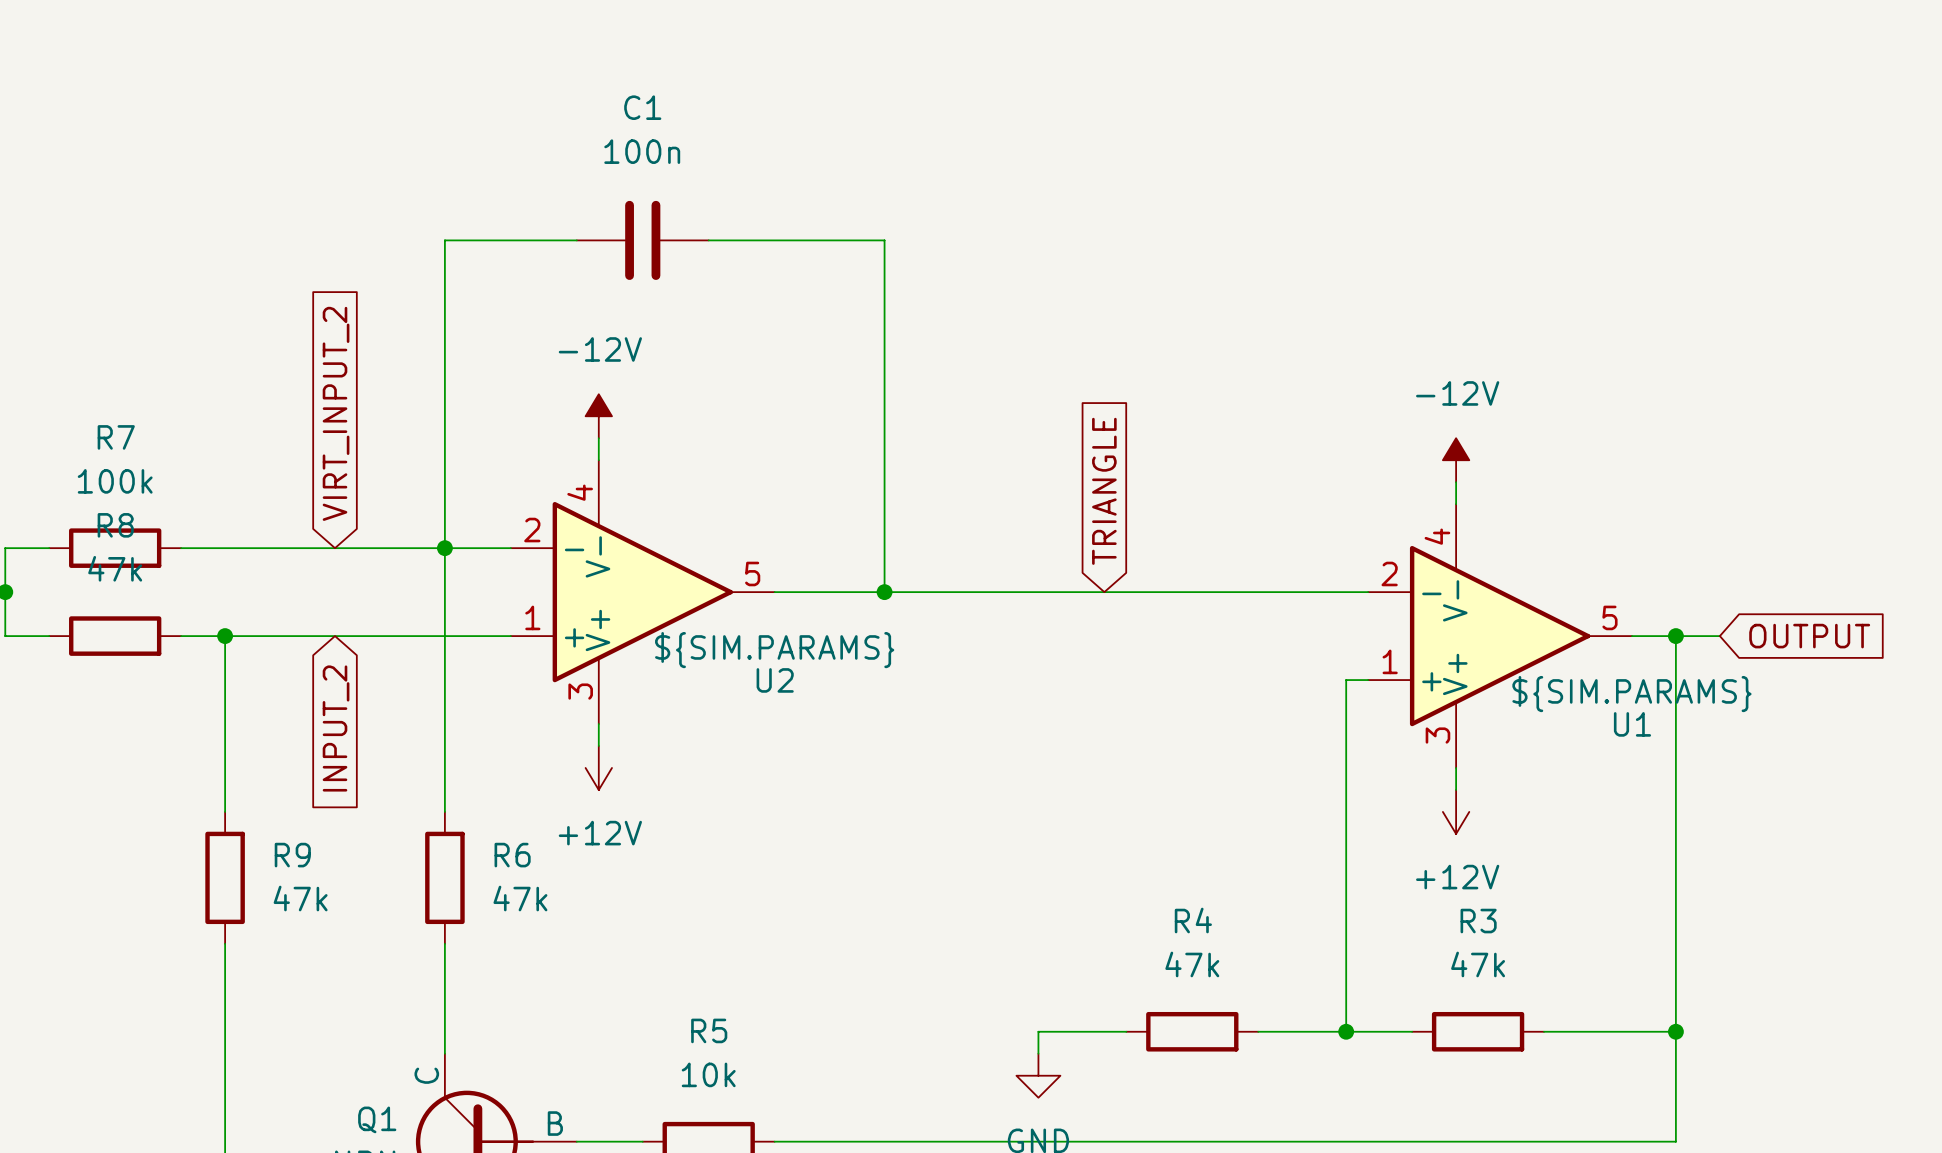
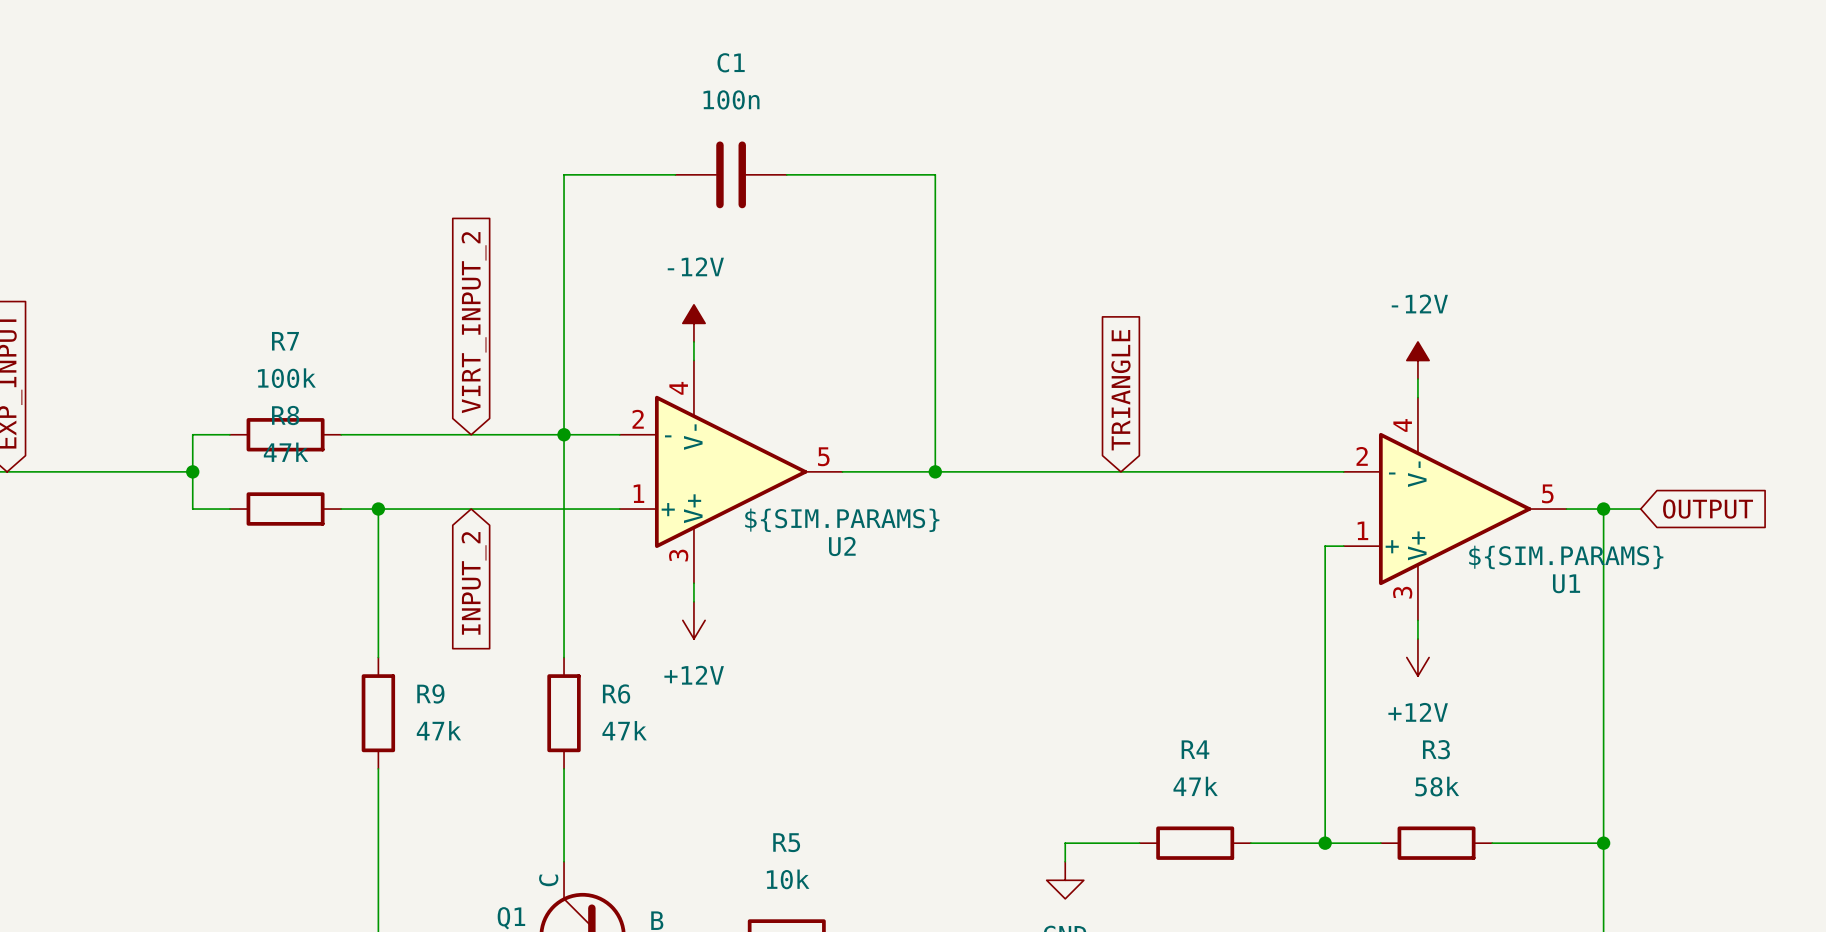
R3 value: 47k (1478, 964) -> 58k (1437, 786)

